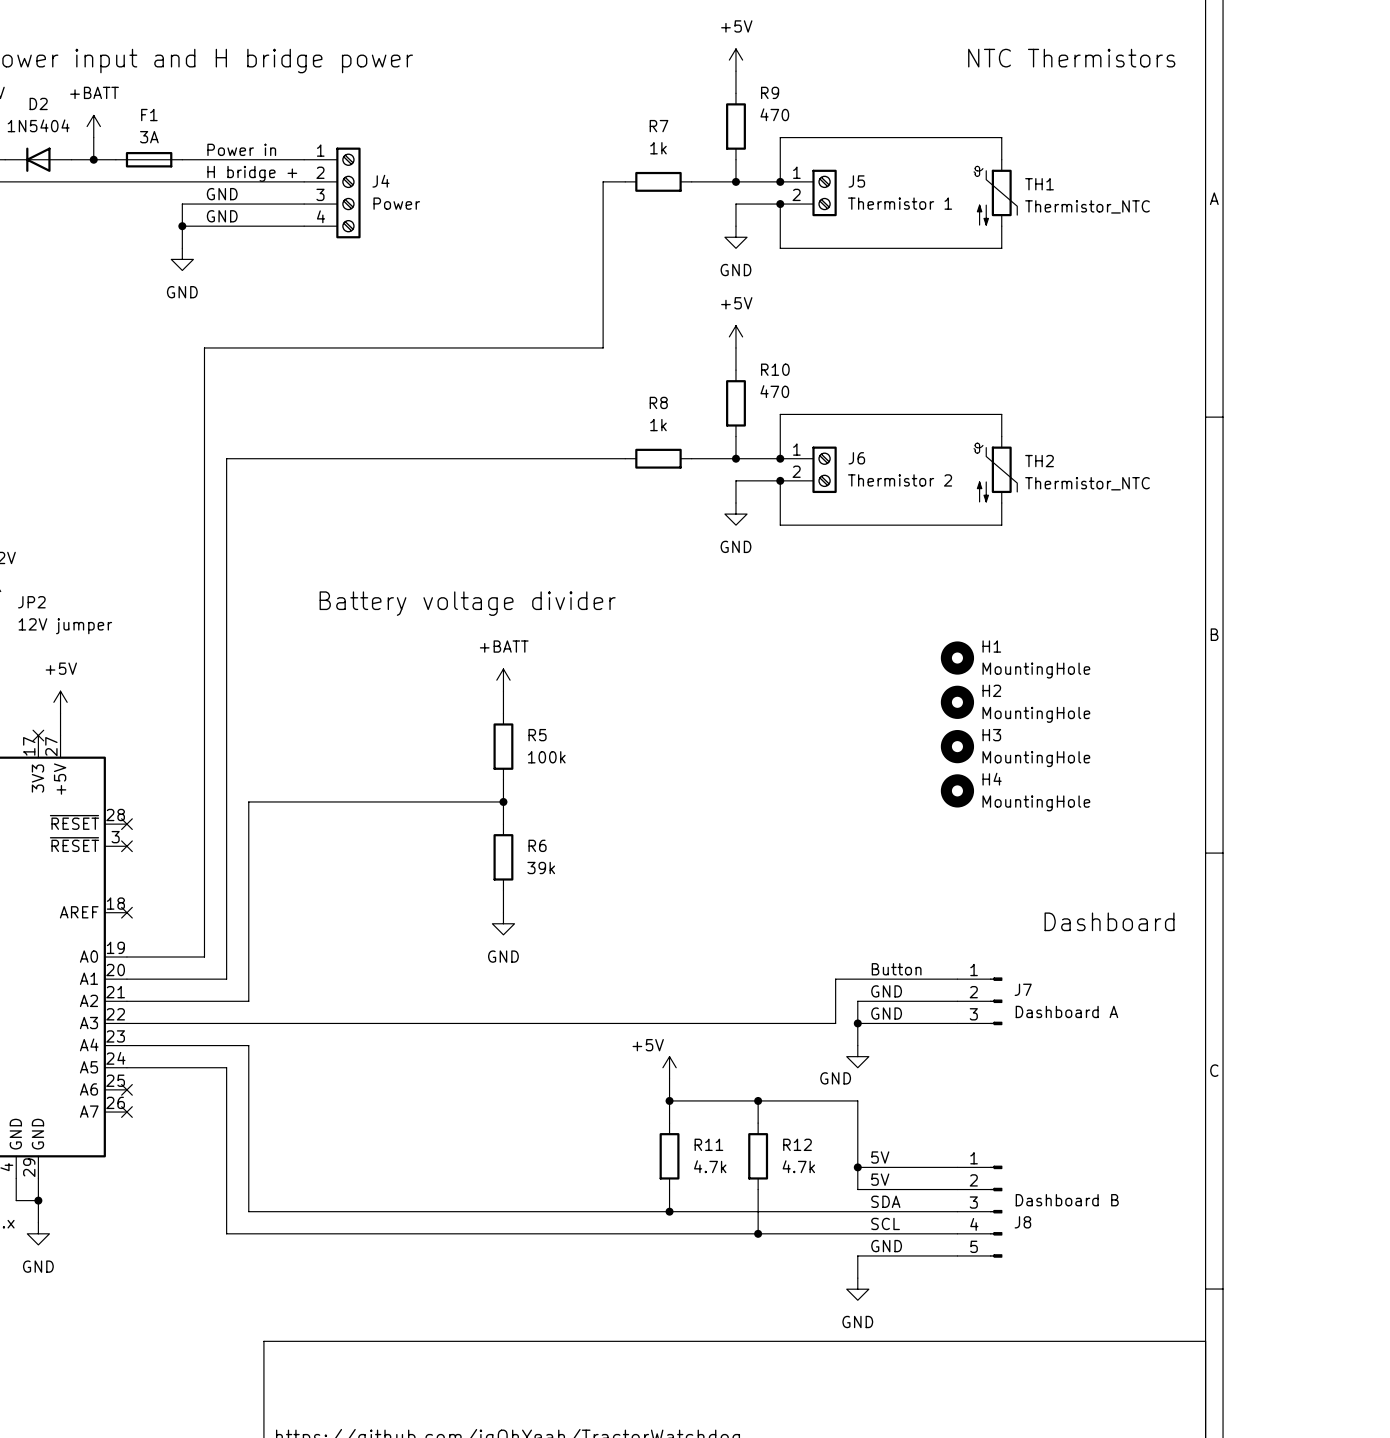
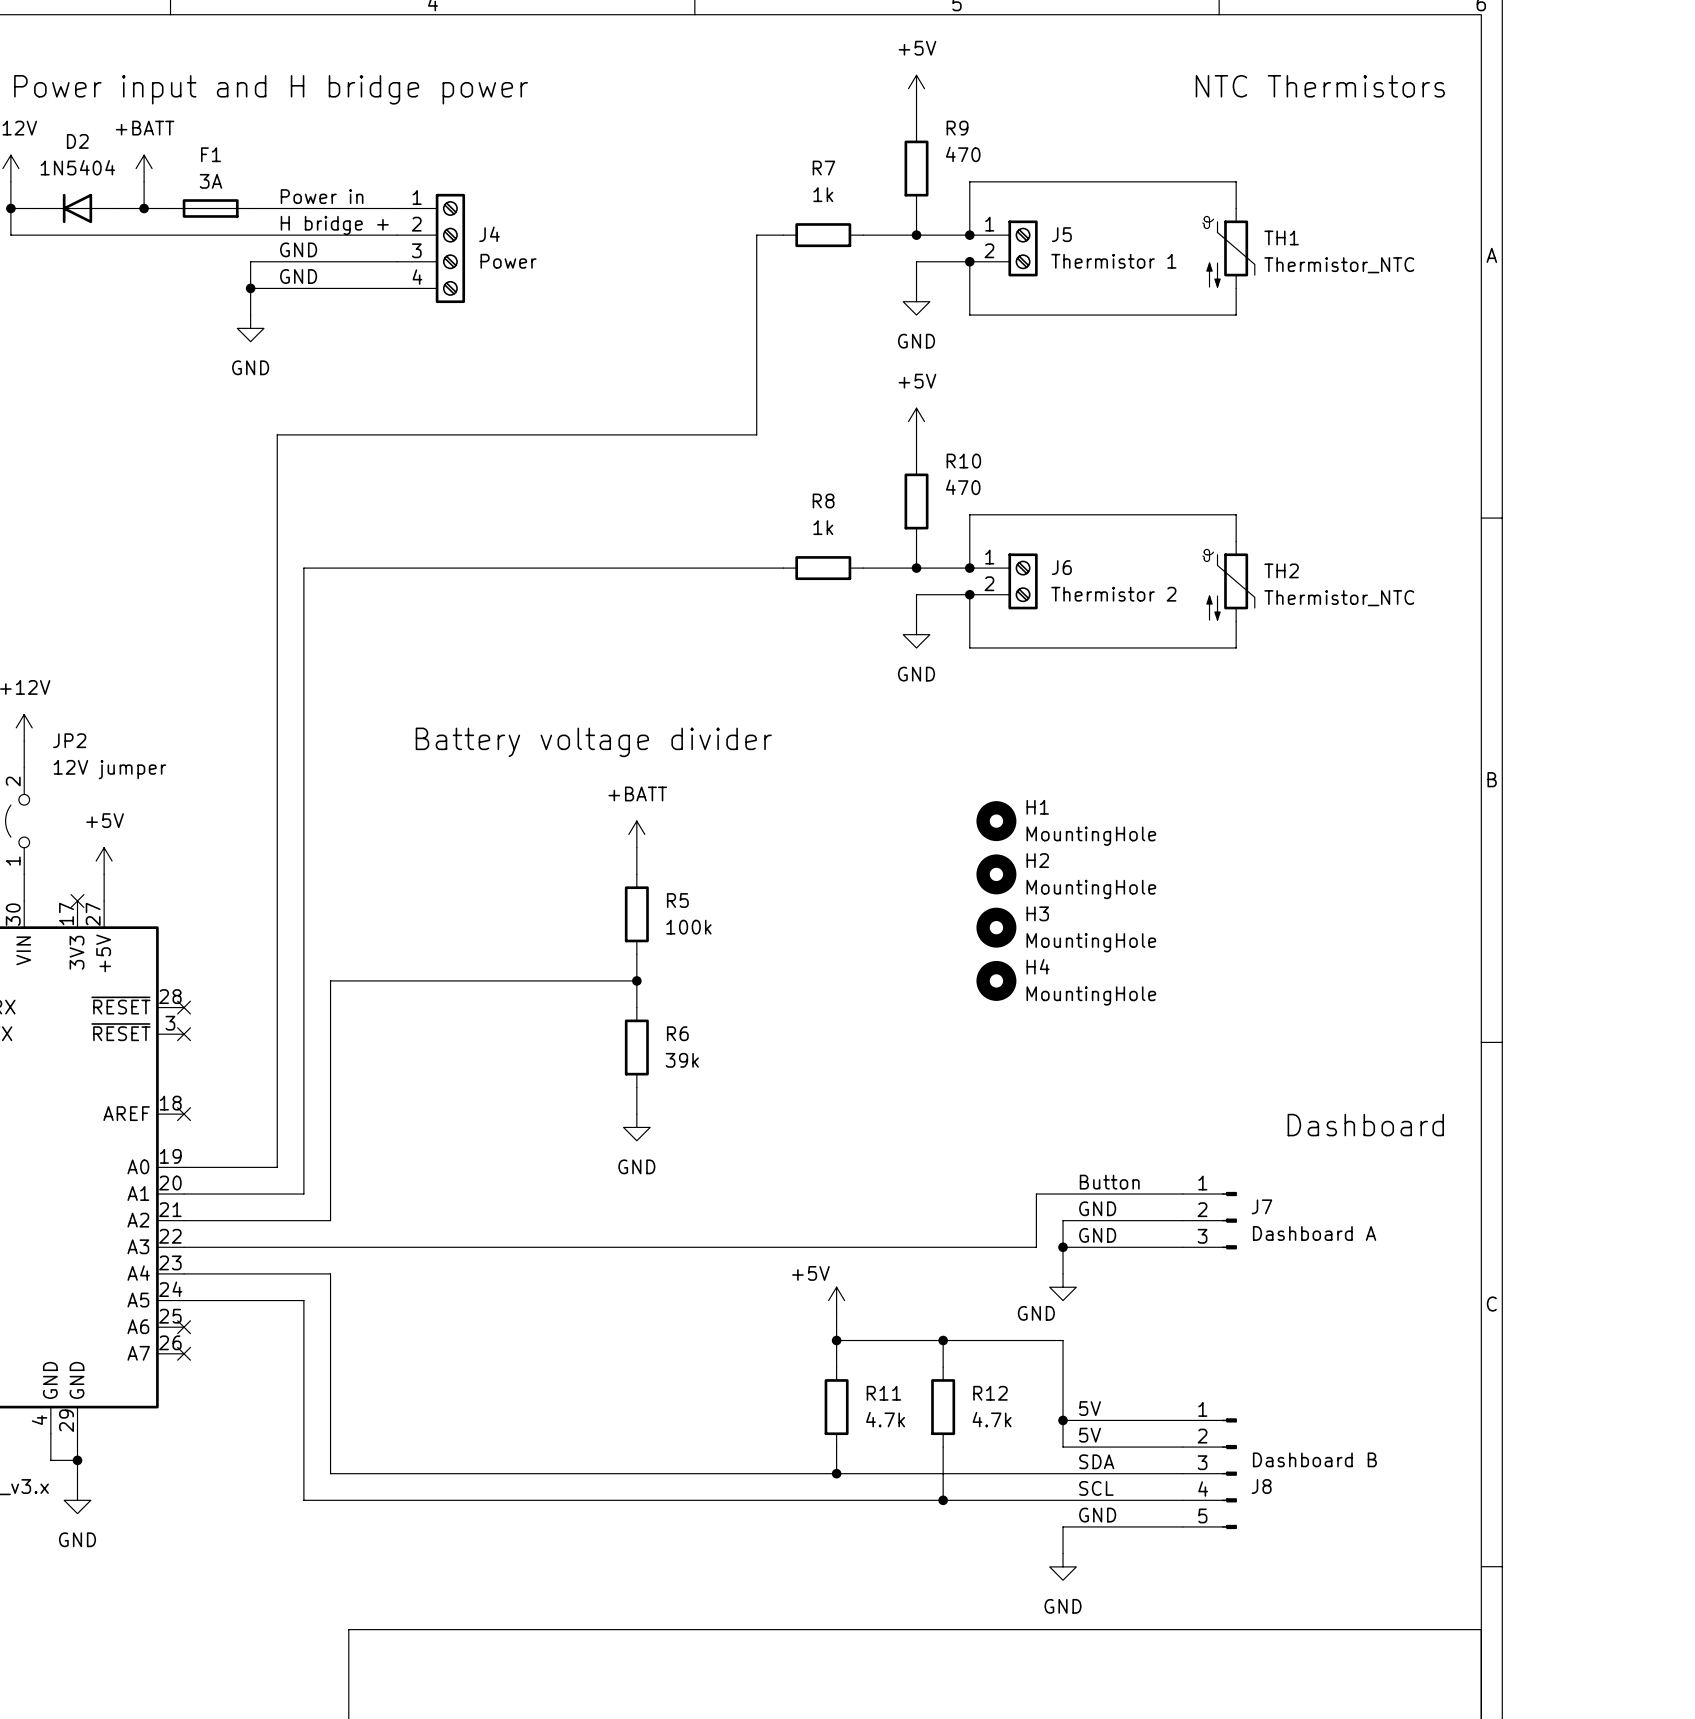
H1 position: (957, 658) -> (996, 821)
H2 position: (957, 702) -> (996, 874)
H3 position: (957, 746) -> (996, 927)
H4 position: (957, 790) -> (996, 980)

